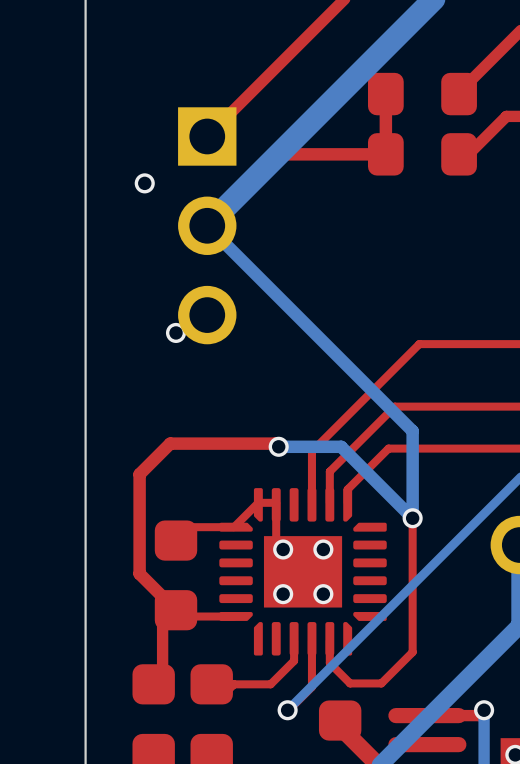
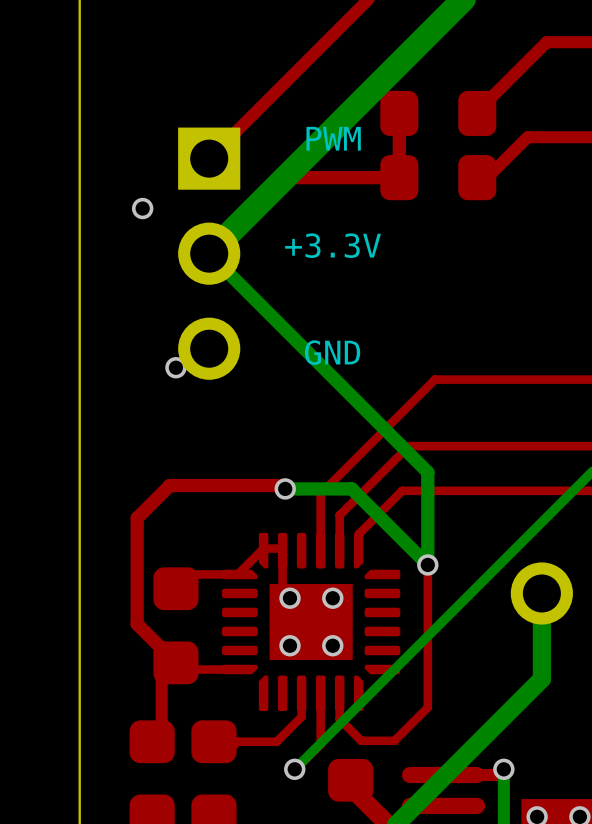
text: none -> PWM (333, 138)
text: none -> +3.3V (333, 245)
text: none -> GND (332, 352)

